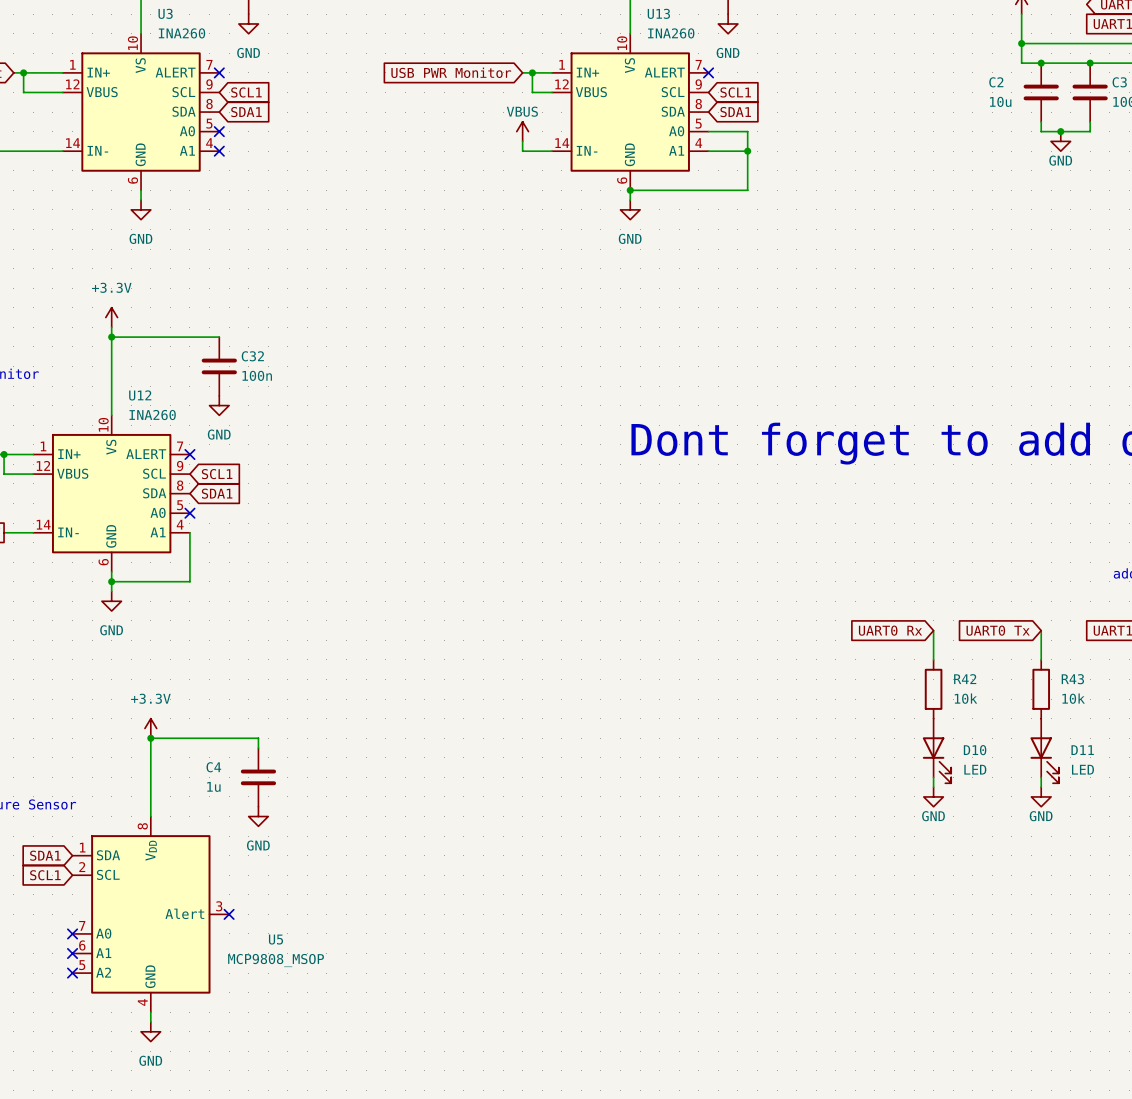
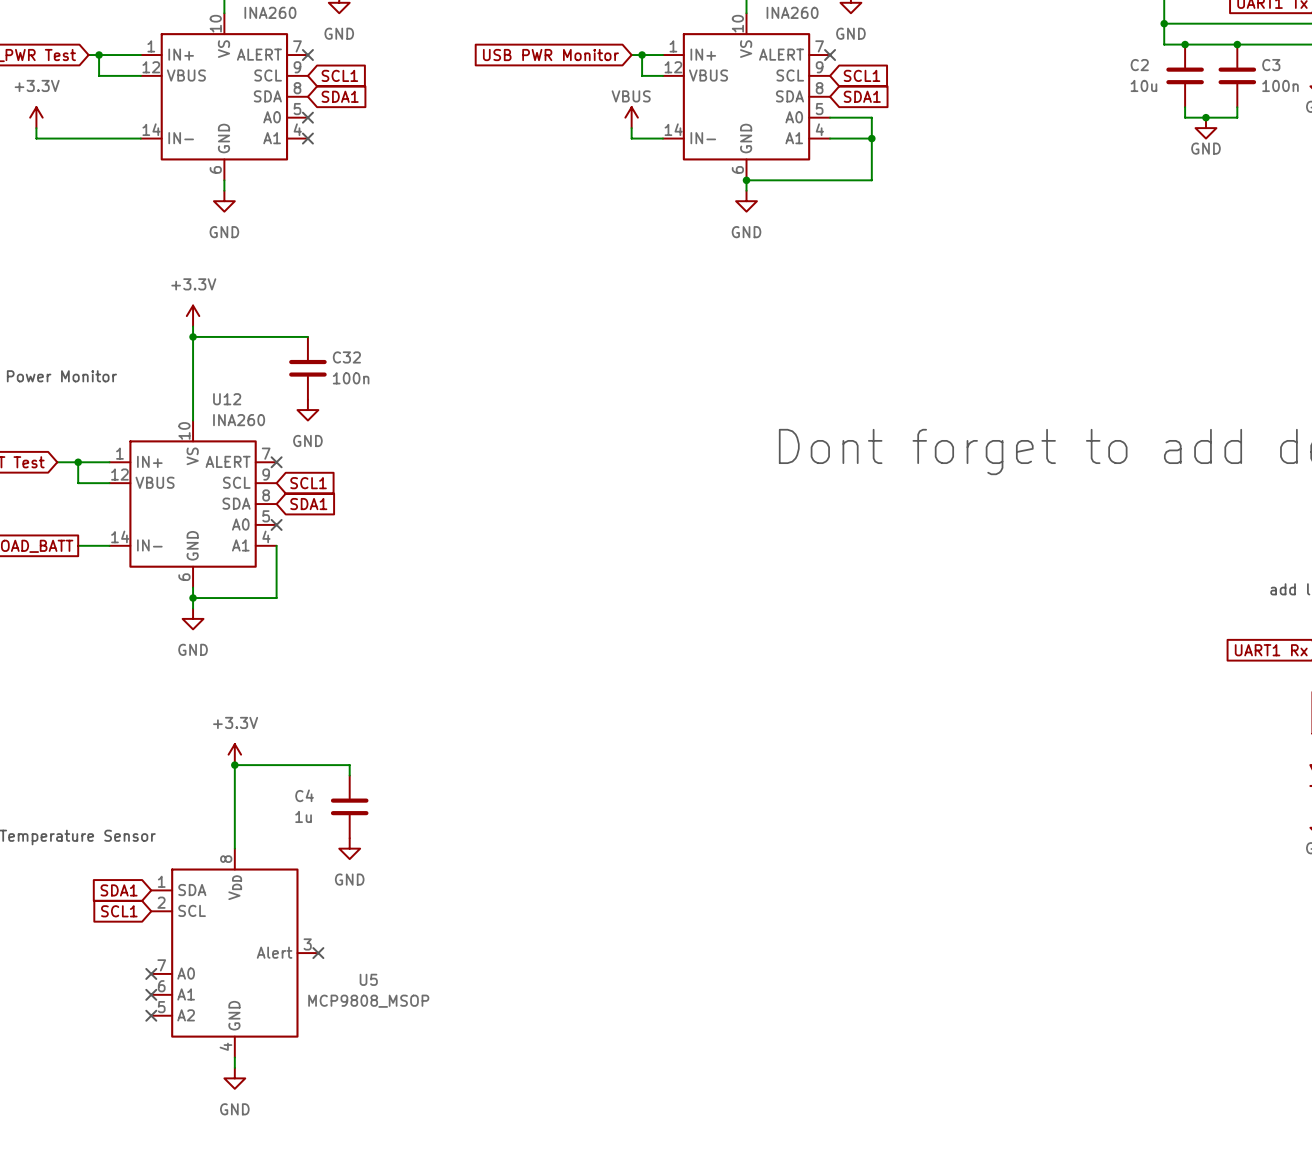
global label: UART0 Rx (890, 630) -> none
wire: (933, 630) (933, 659) -> none
global label: UART0 Tx (998, 630) -> none
wire: (1041, 630) (1041, 659) -> none
R42: 10k (933, 689) -> none
R43: 10k (1041, 689) -> none
D10: LED (937, 750) -> none
D11: LED (1044, 750) -> none
wire: (933, 777) (933, 787) -> none
wire: (1041, 777) (1041, 787) -> none
power symbol: GND (933, 796) -> none
power symbol: GND (1041, 796) -> none

